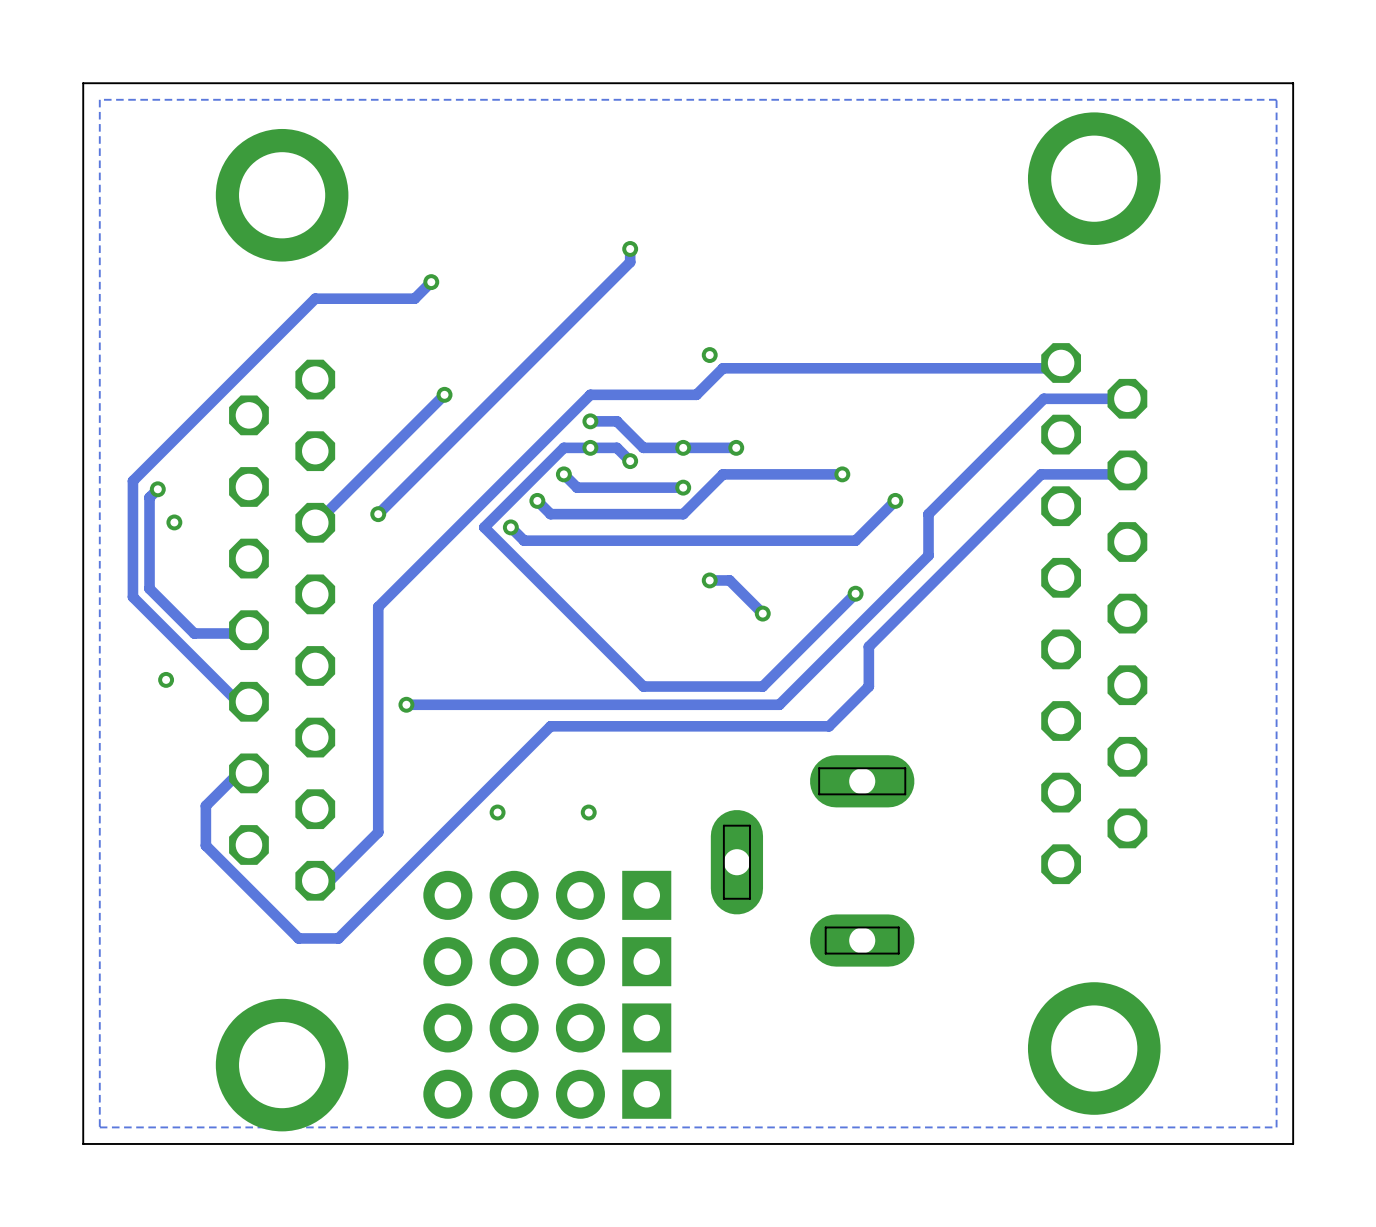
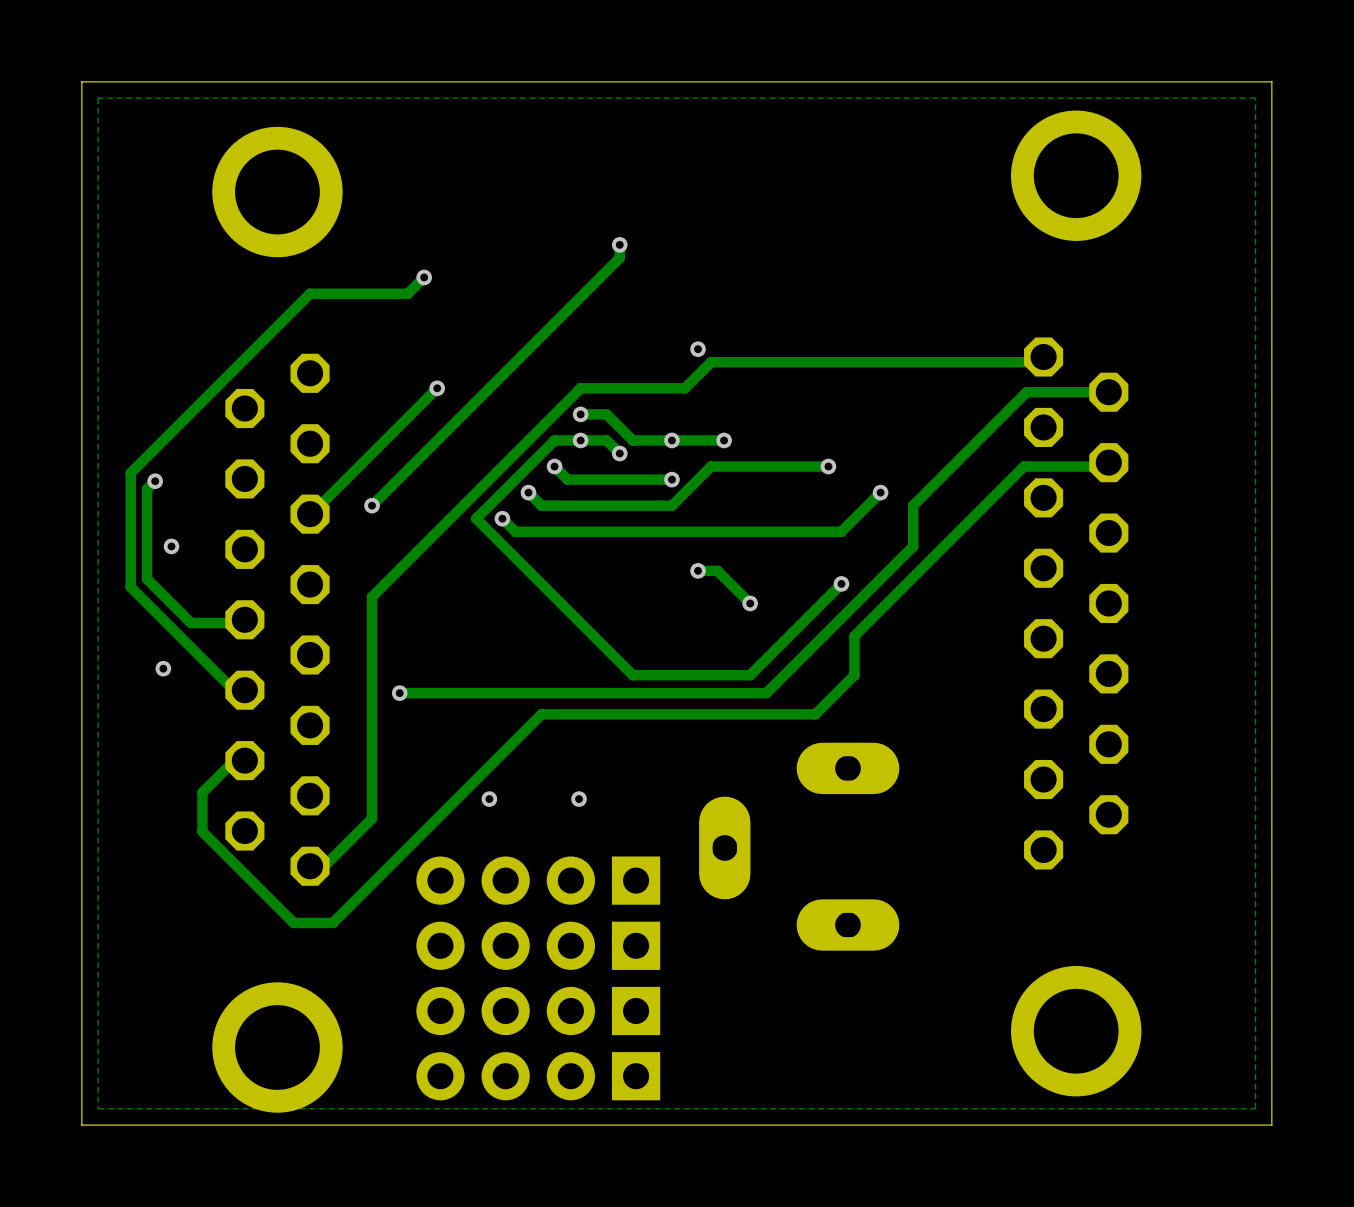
via position: (174, 522) -> (171, 546)

